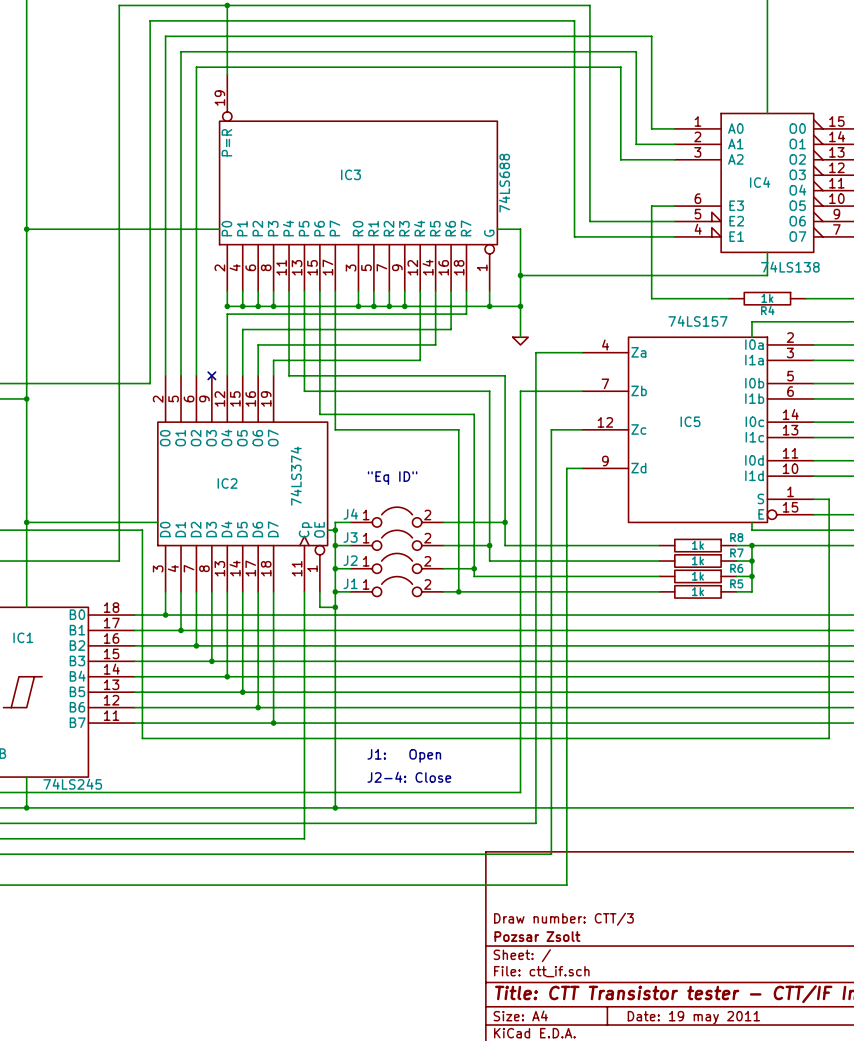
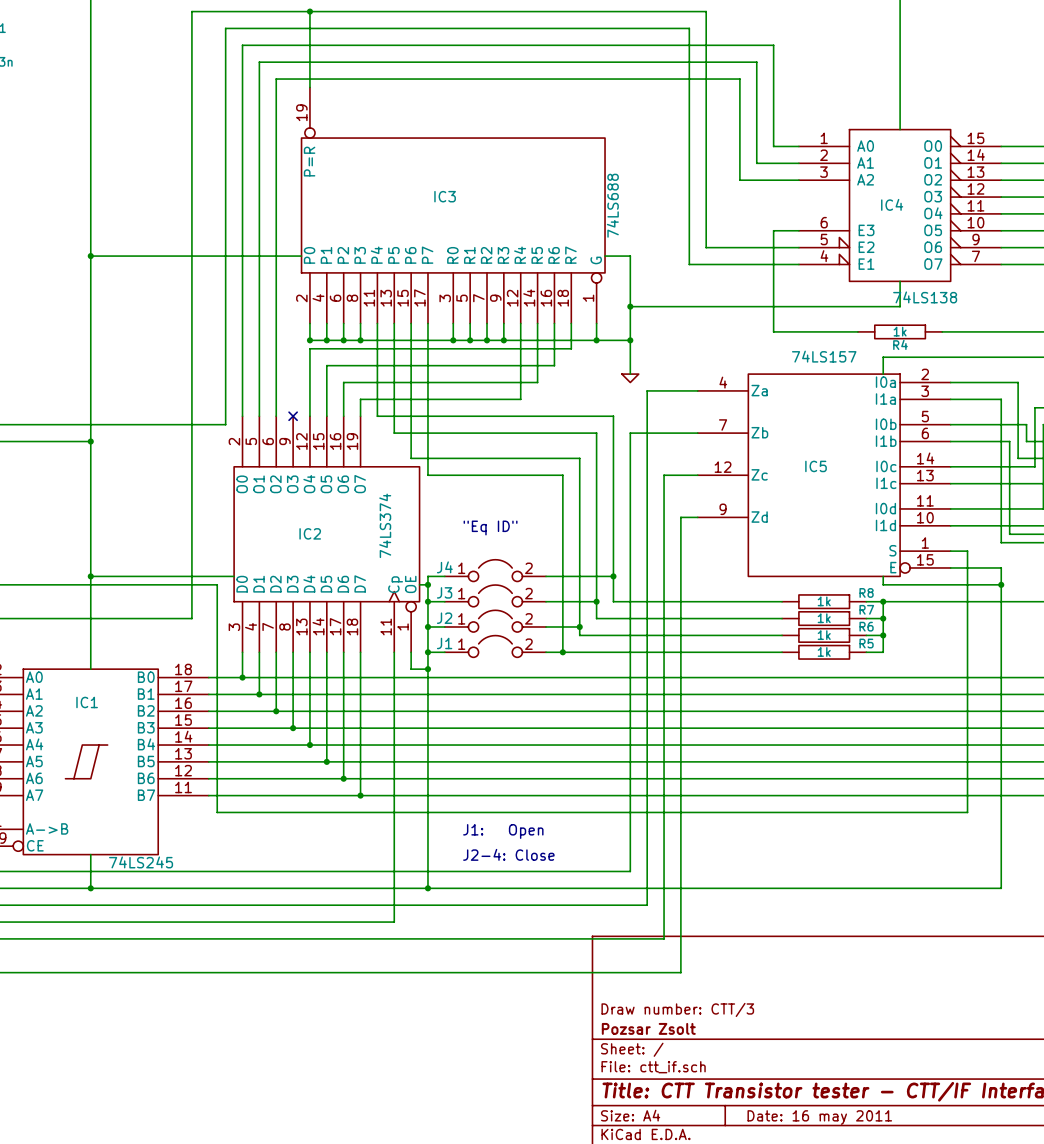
title block: Date: 19 may 2011 (693, 1017) -> Date: 16 may 2011 (819, 1117)

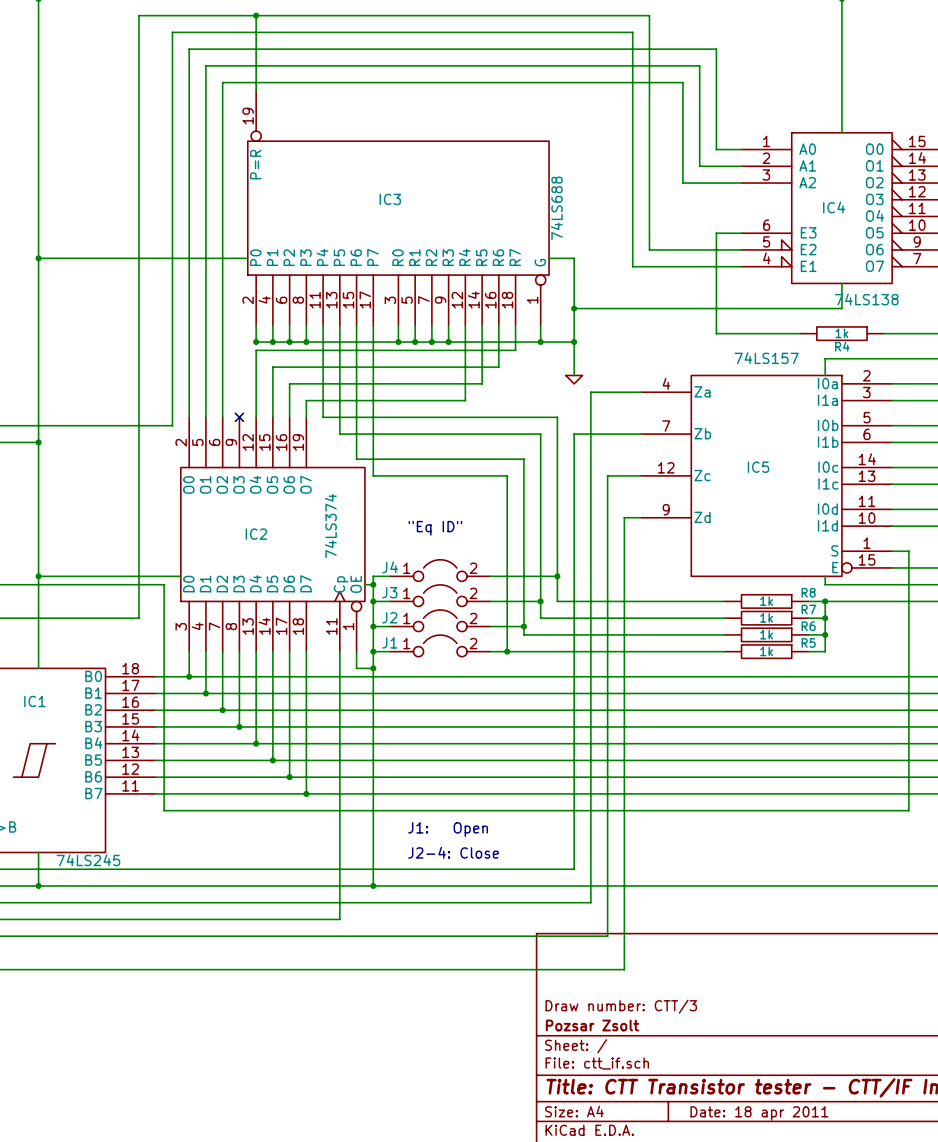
title block: Date: 16 may 2011 (819, 1117) -> Date: 18 apr 2011 (759, 1113)

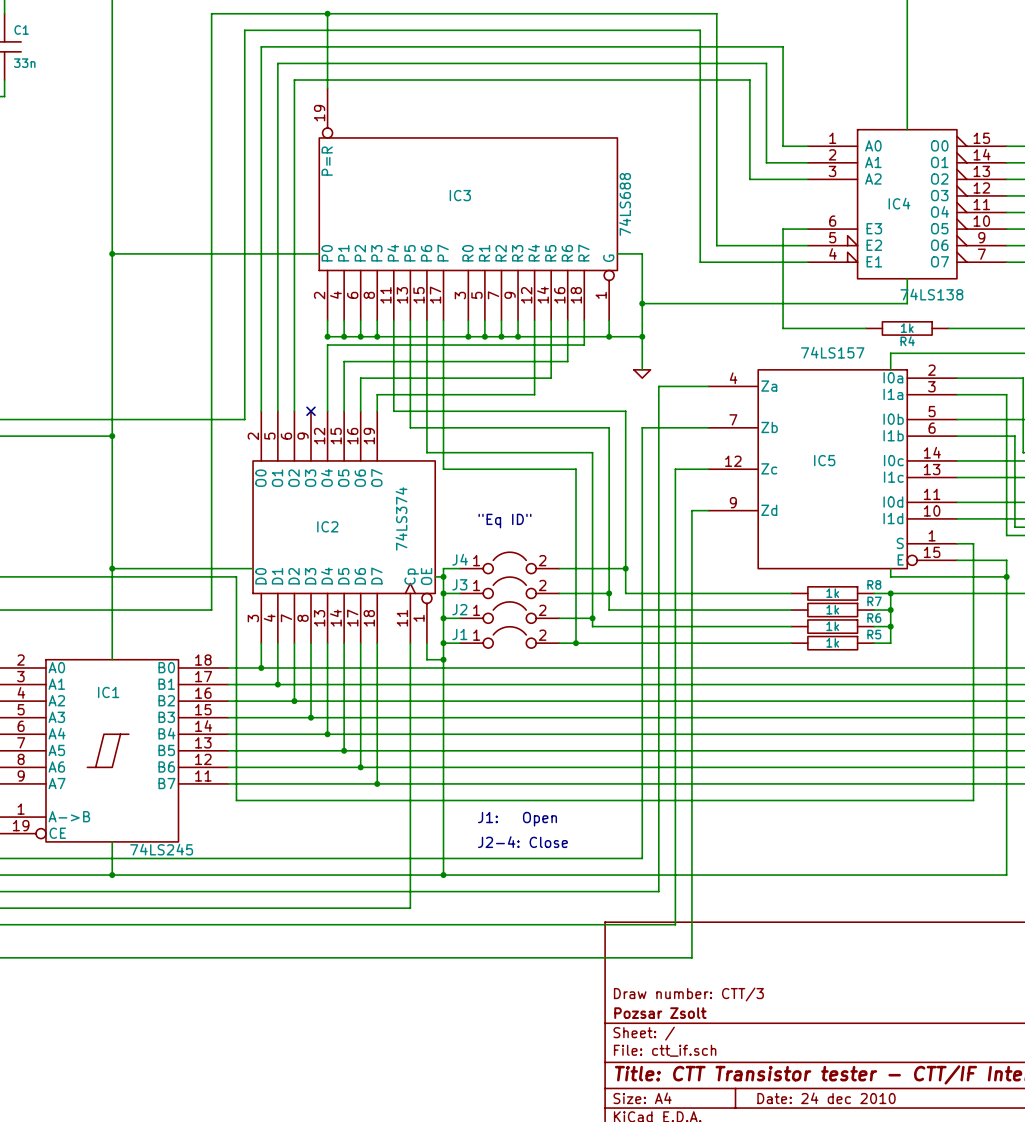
title block: Date: 18 apr 2011 (759, 1113) -> Date: 24 dec 2010 (826, 1098)

